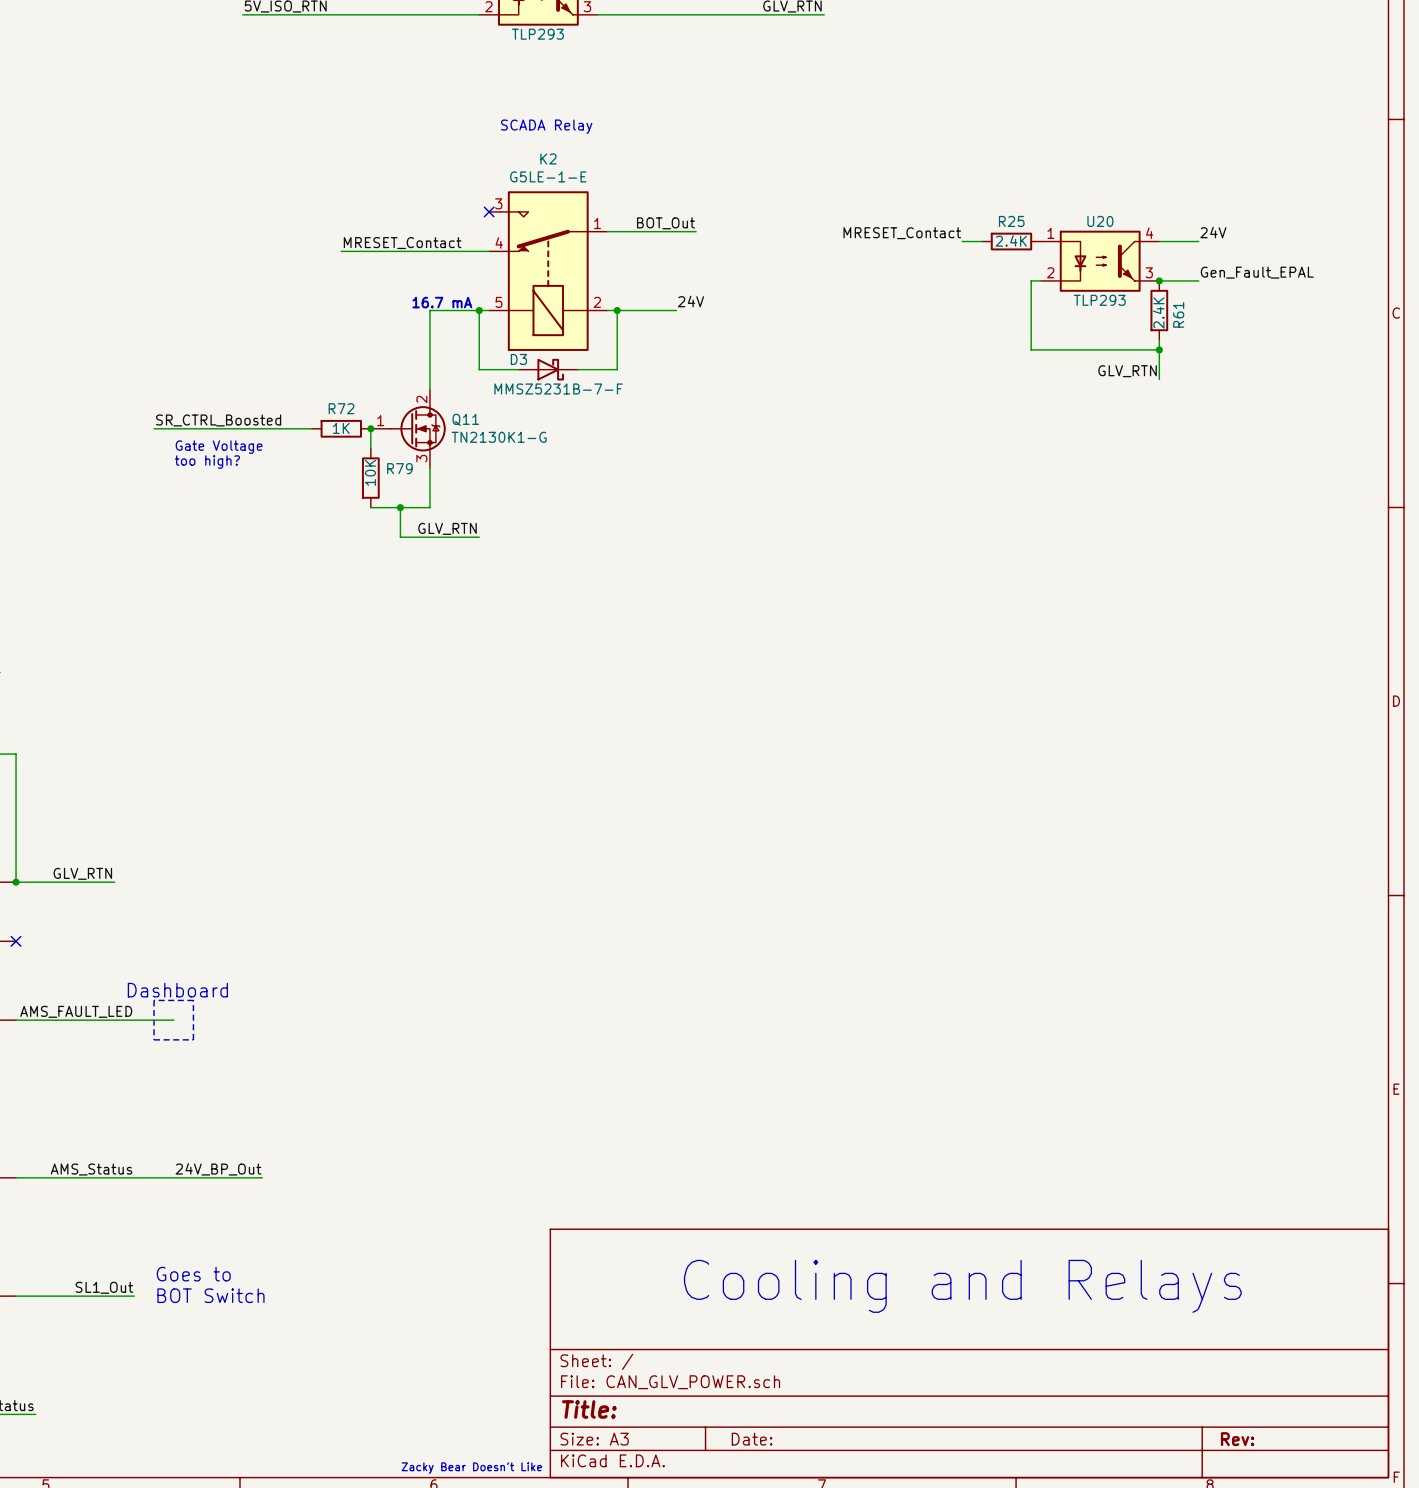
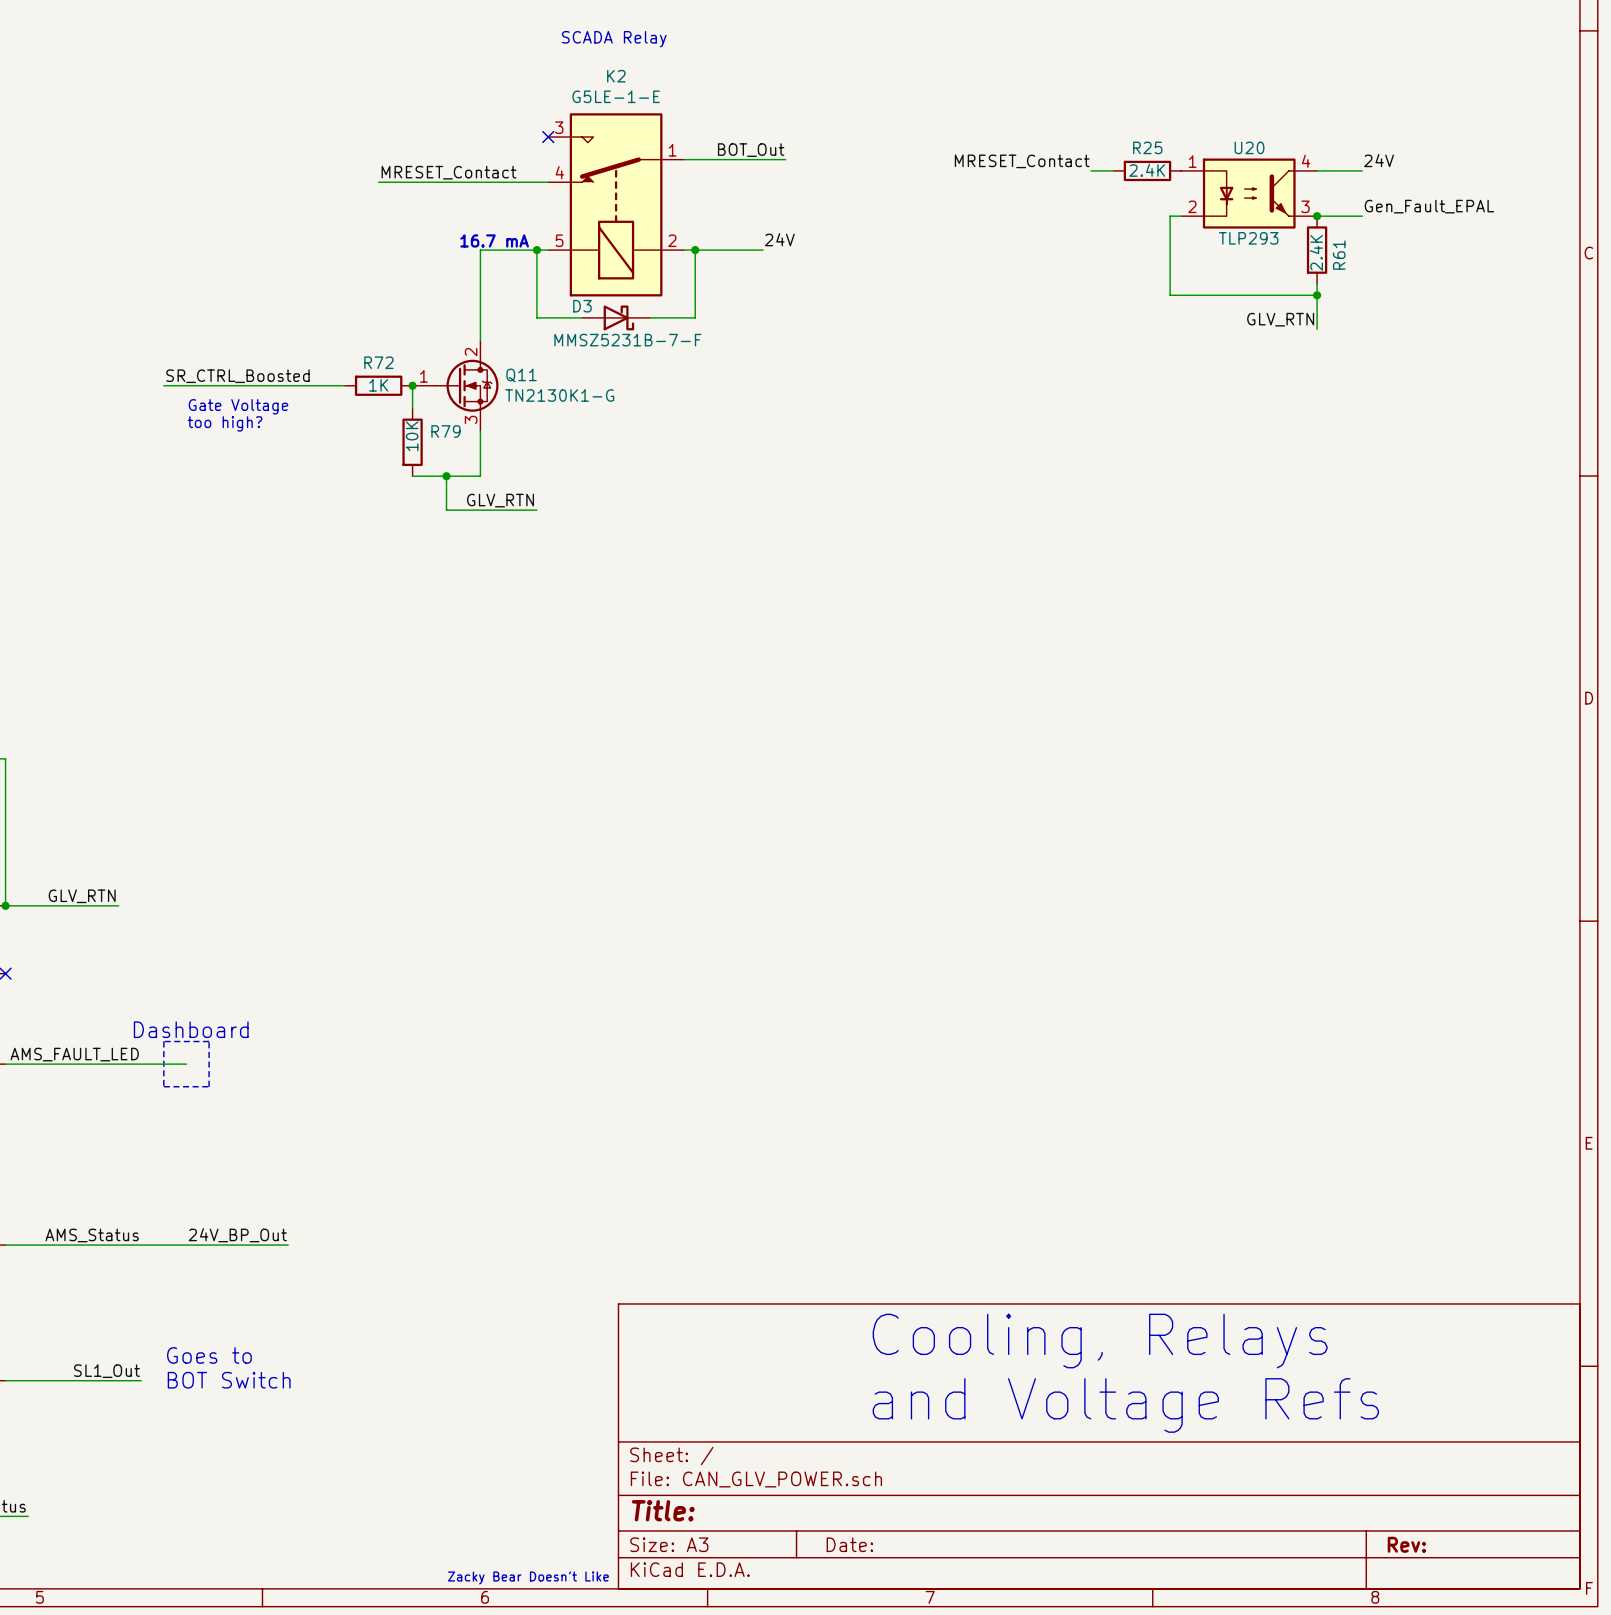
text: Cooling and Relays (962, 1286) -> Cooling, Relays (1100, 1341)
text: none -> and Voltage Refs (1125, 1405)

